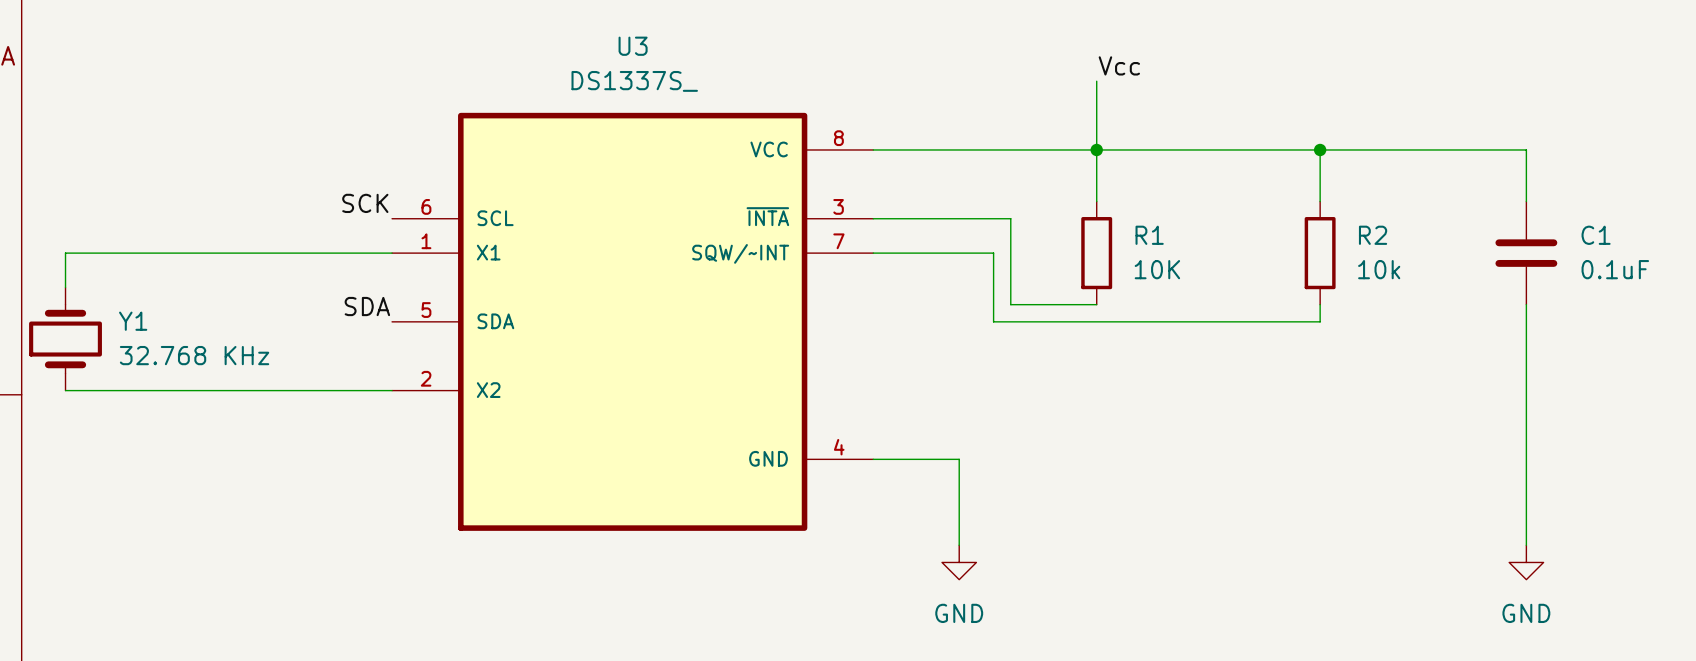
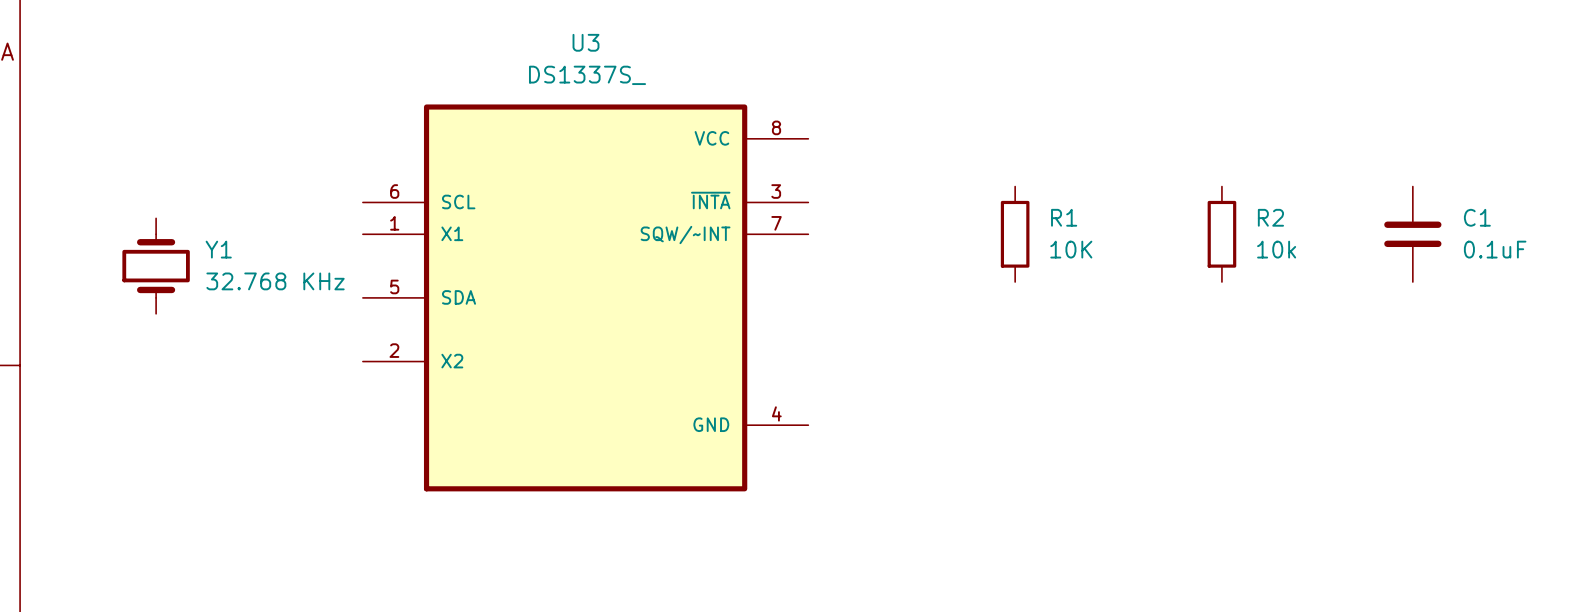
label: Vcc (1119, 65) -> none
wire: (1096, 81) (1096, 201) -> none
wire: (873, 149) (1526, 149) (1526, 201) -> none
junction: (1096, 149) -> none
wire: (1320, 149) (1320, 201) -> none
junction: (1320, 149) -> none
label: SCK (365, 203) -> none
wire: (873, 218) (1010, 218) (1010, 304) (1096, 304) -> none
wire: (392, 253) (65, 253) (65, 287) -> none
wire: (873, 253) (993, 253) (993, 321) (1320, 321) (1320, 304) -> none
wire: (1526, 304) (1526, 545) -> none
label: SDA (367, 306) -> none
Y1 position: (65, 339) -> (156, 266)
wire: (65, 390) (392, 390) -> none
wire: (873, 459) (959, 459) (959, 545) -> none
power symbol: GND (959, 562) -> none
power symbol: GND (1526, 562) -> none

